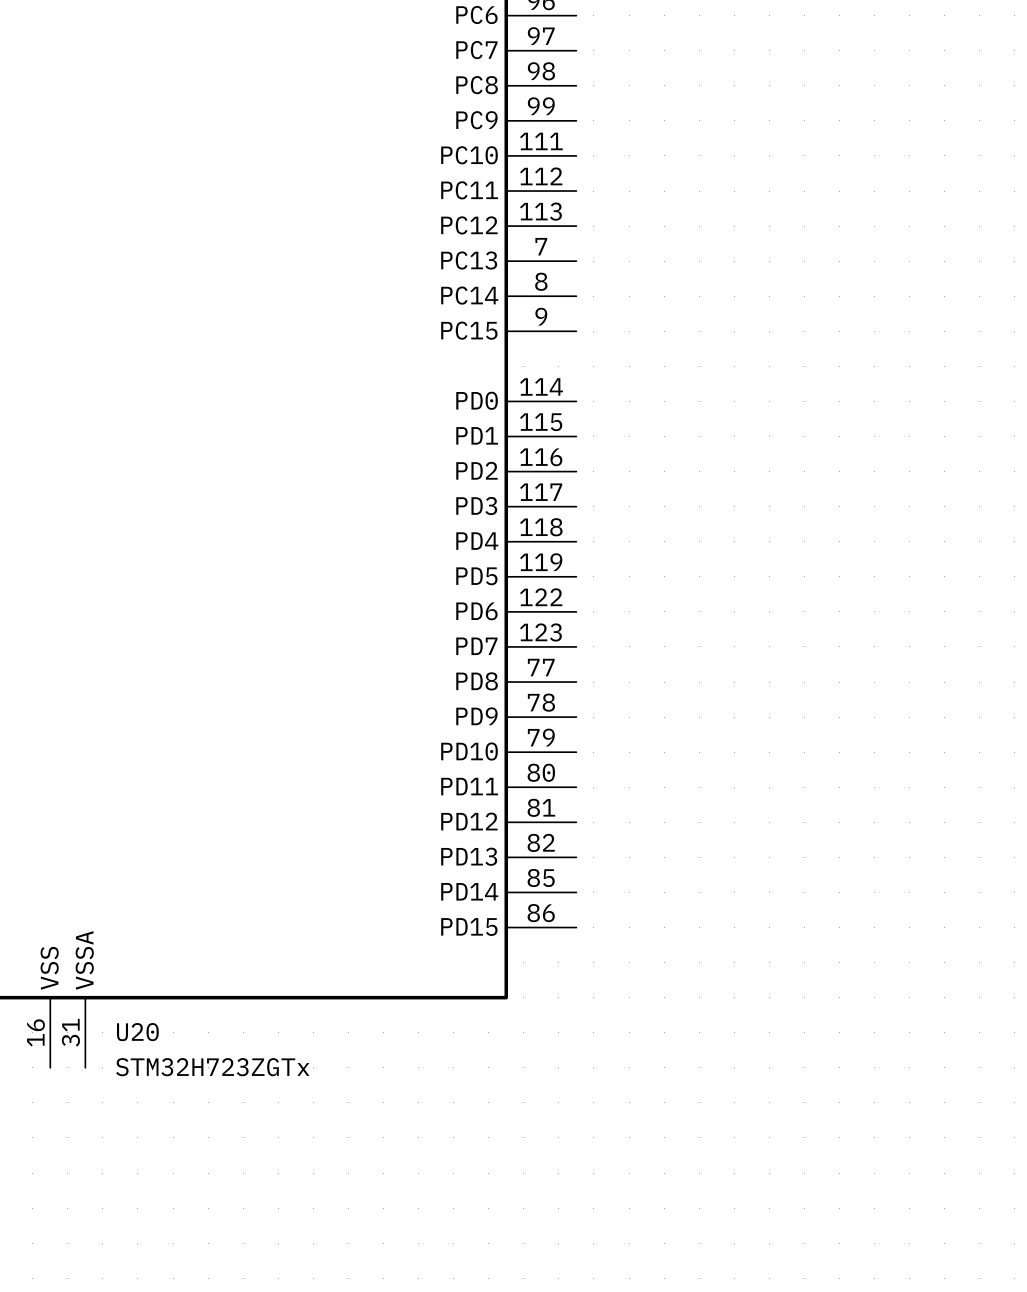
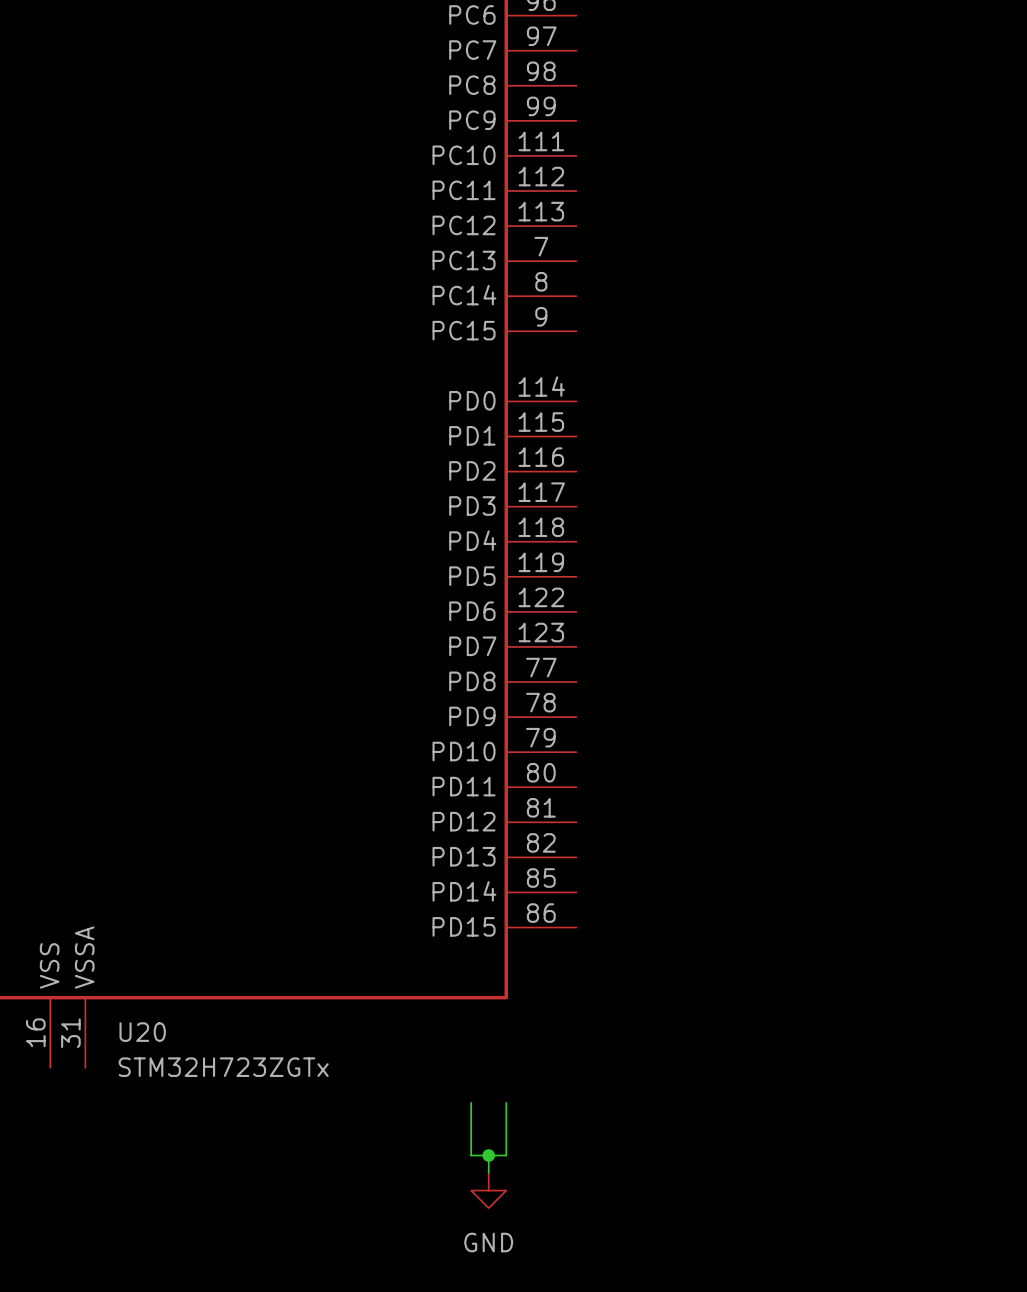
wire: none -> (471, 1102) (471, 1155) (506, 1155) (506, 1102)
wire: none -> (488, 1155) (488, 1173)
junction: none -> (488, 1155)
power symbol: none -> GND (488, 1190)

